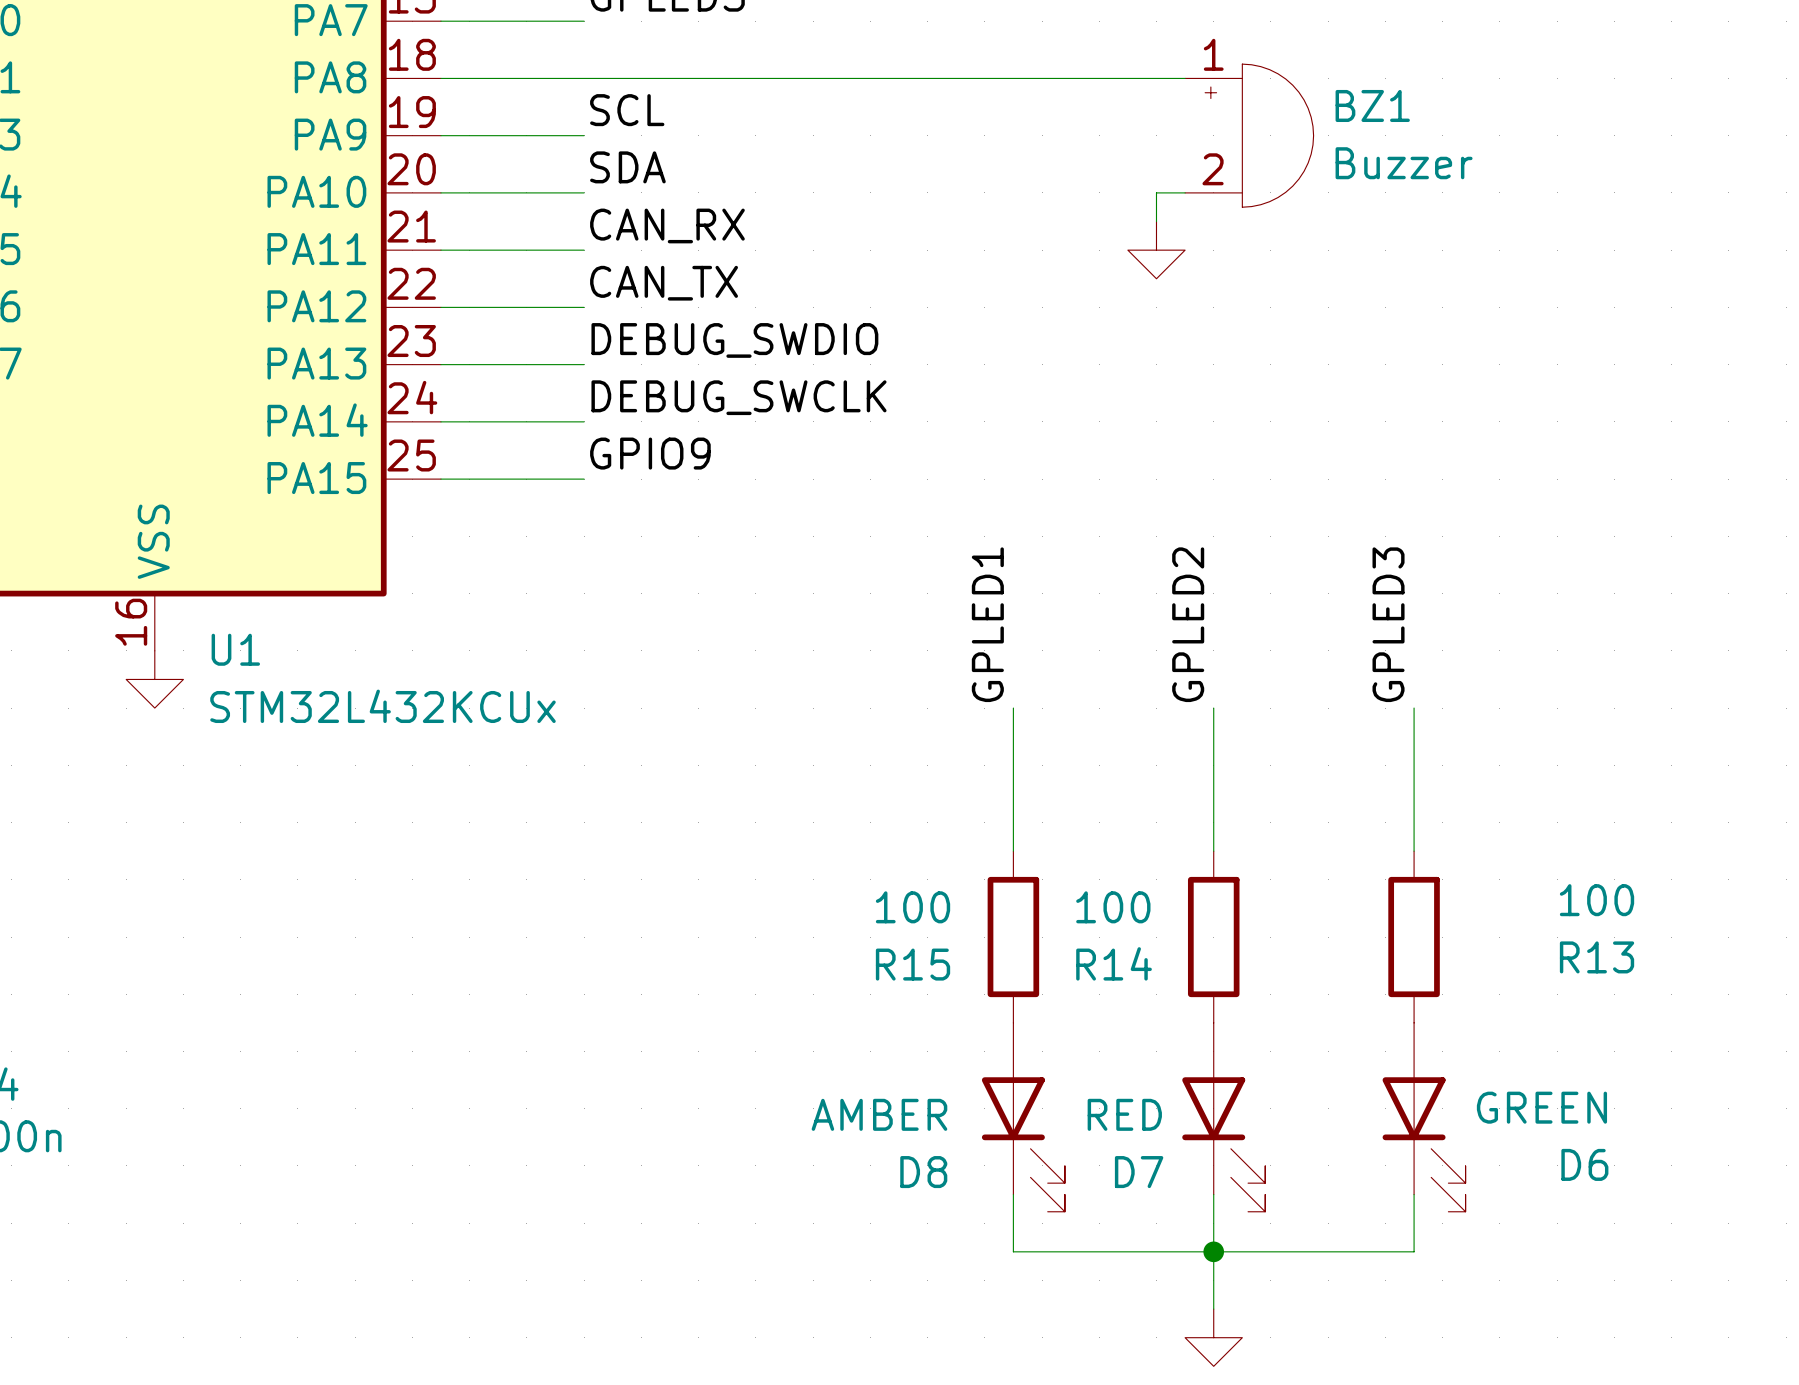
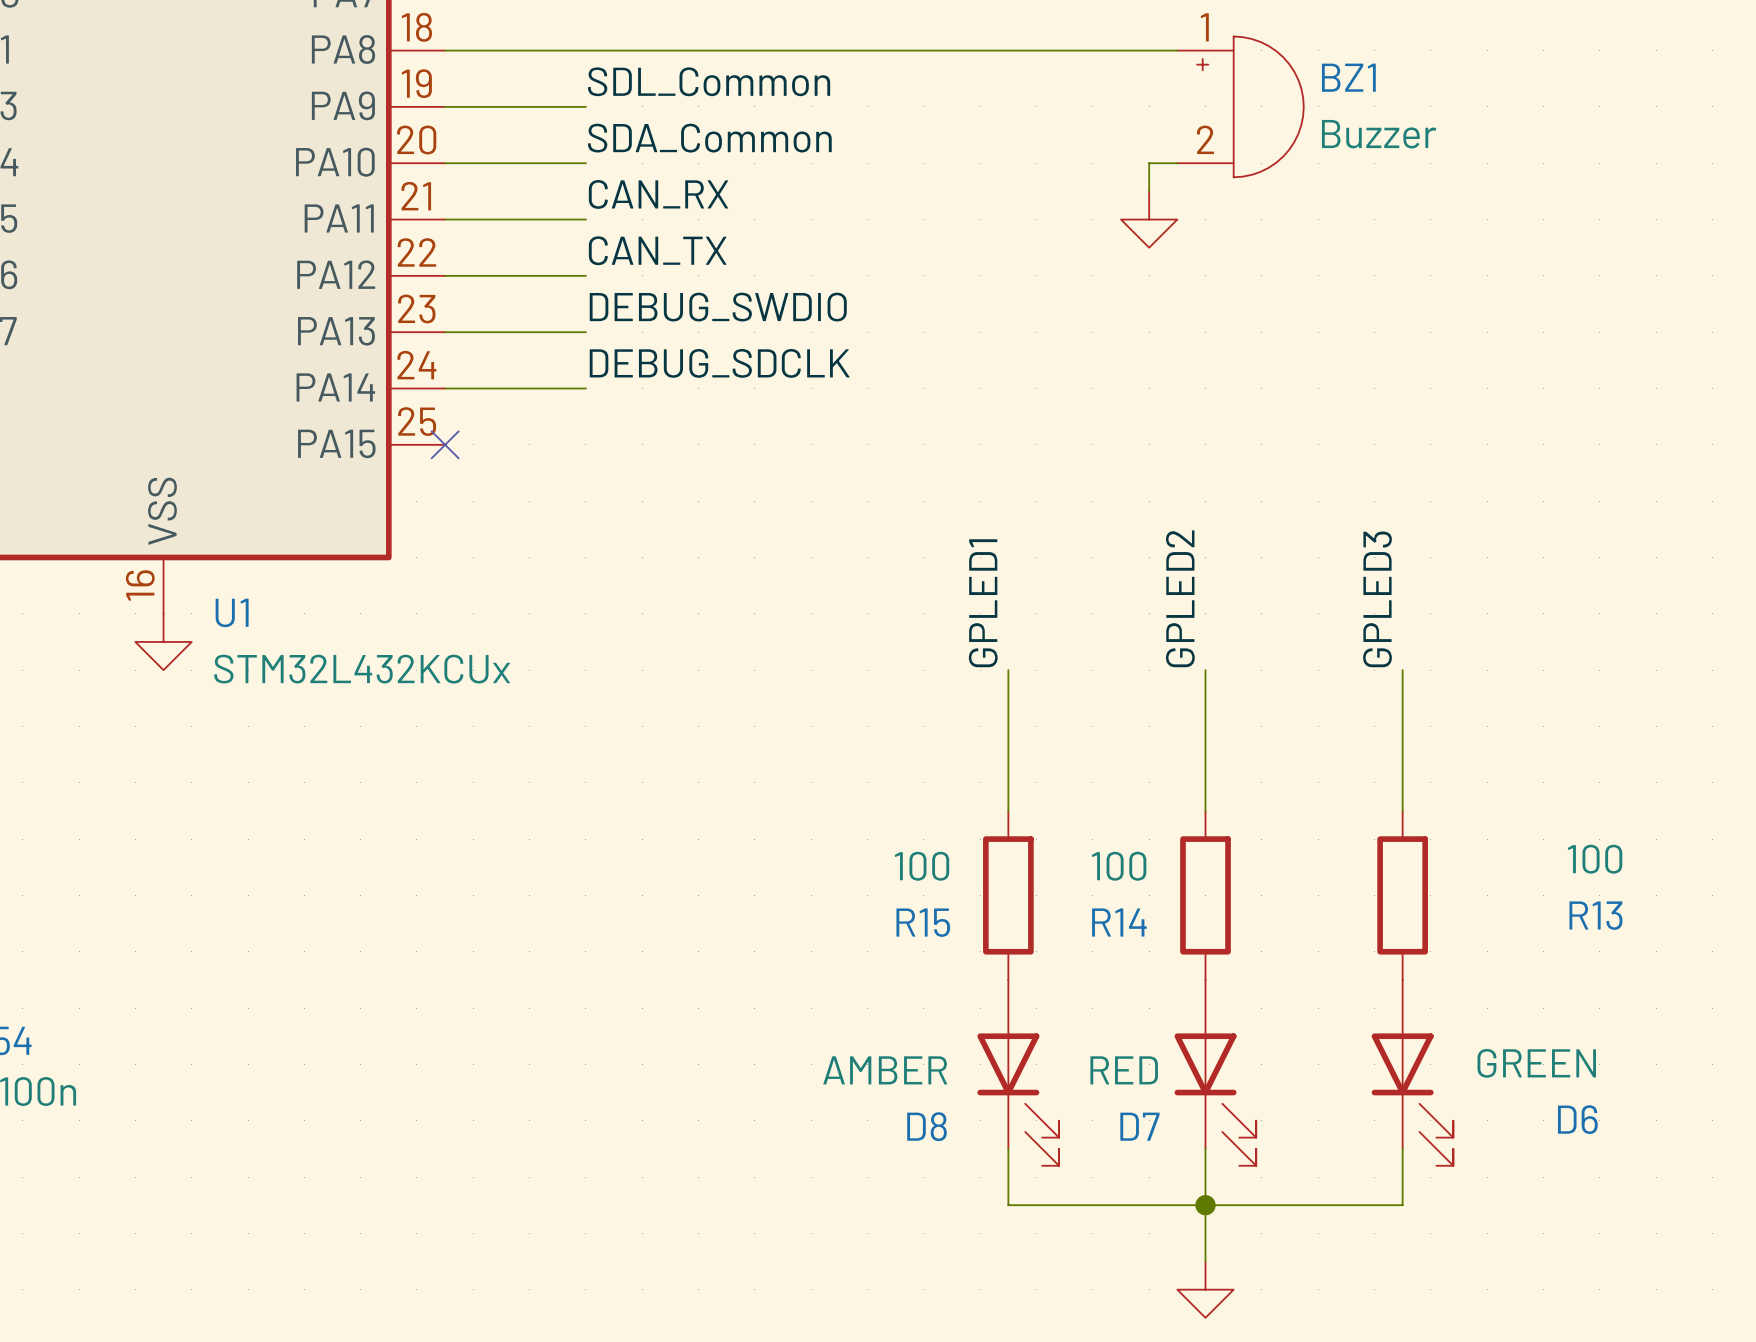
label: SCL (627, 110) -> SDL_Common (709, 81)
label: SDA (627, 167) -> SDA_Common (709, 138)
label: DEBUG_SWCLK (738, 397) -> DEBUG_SDCLK (719, 363)
label: GPIO9 (650, 453) -> none
wire: (440, 479) (584, 479) -> none
no-connect mark: none -> (445, 444)

